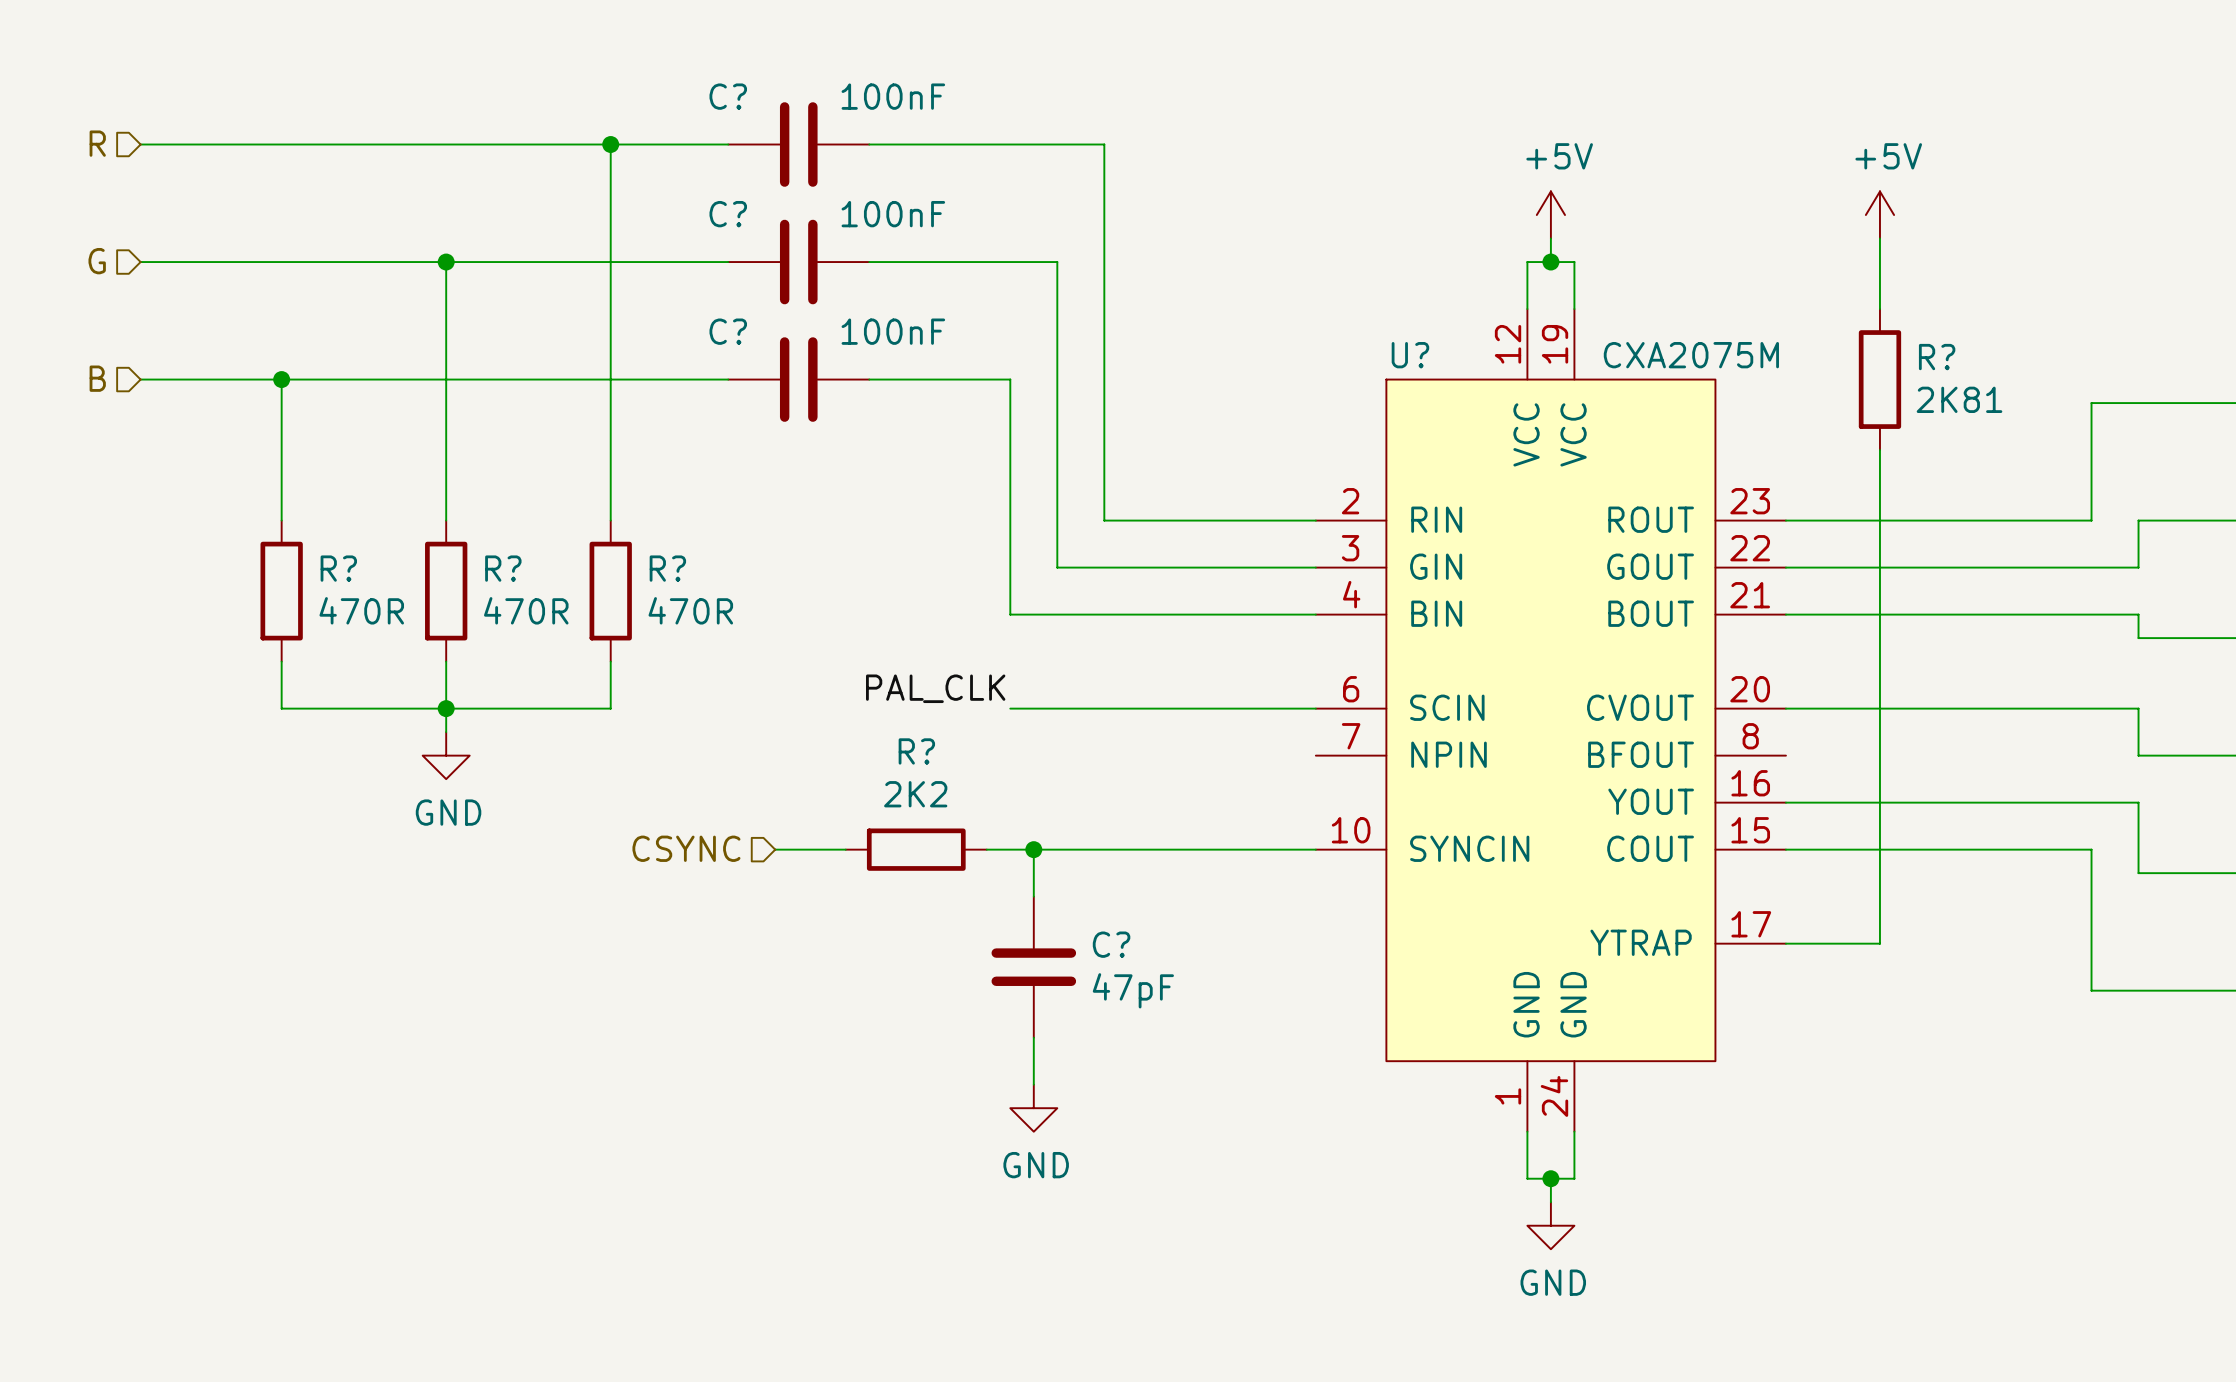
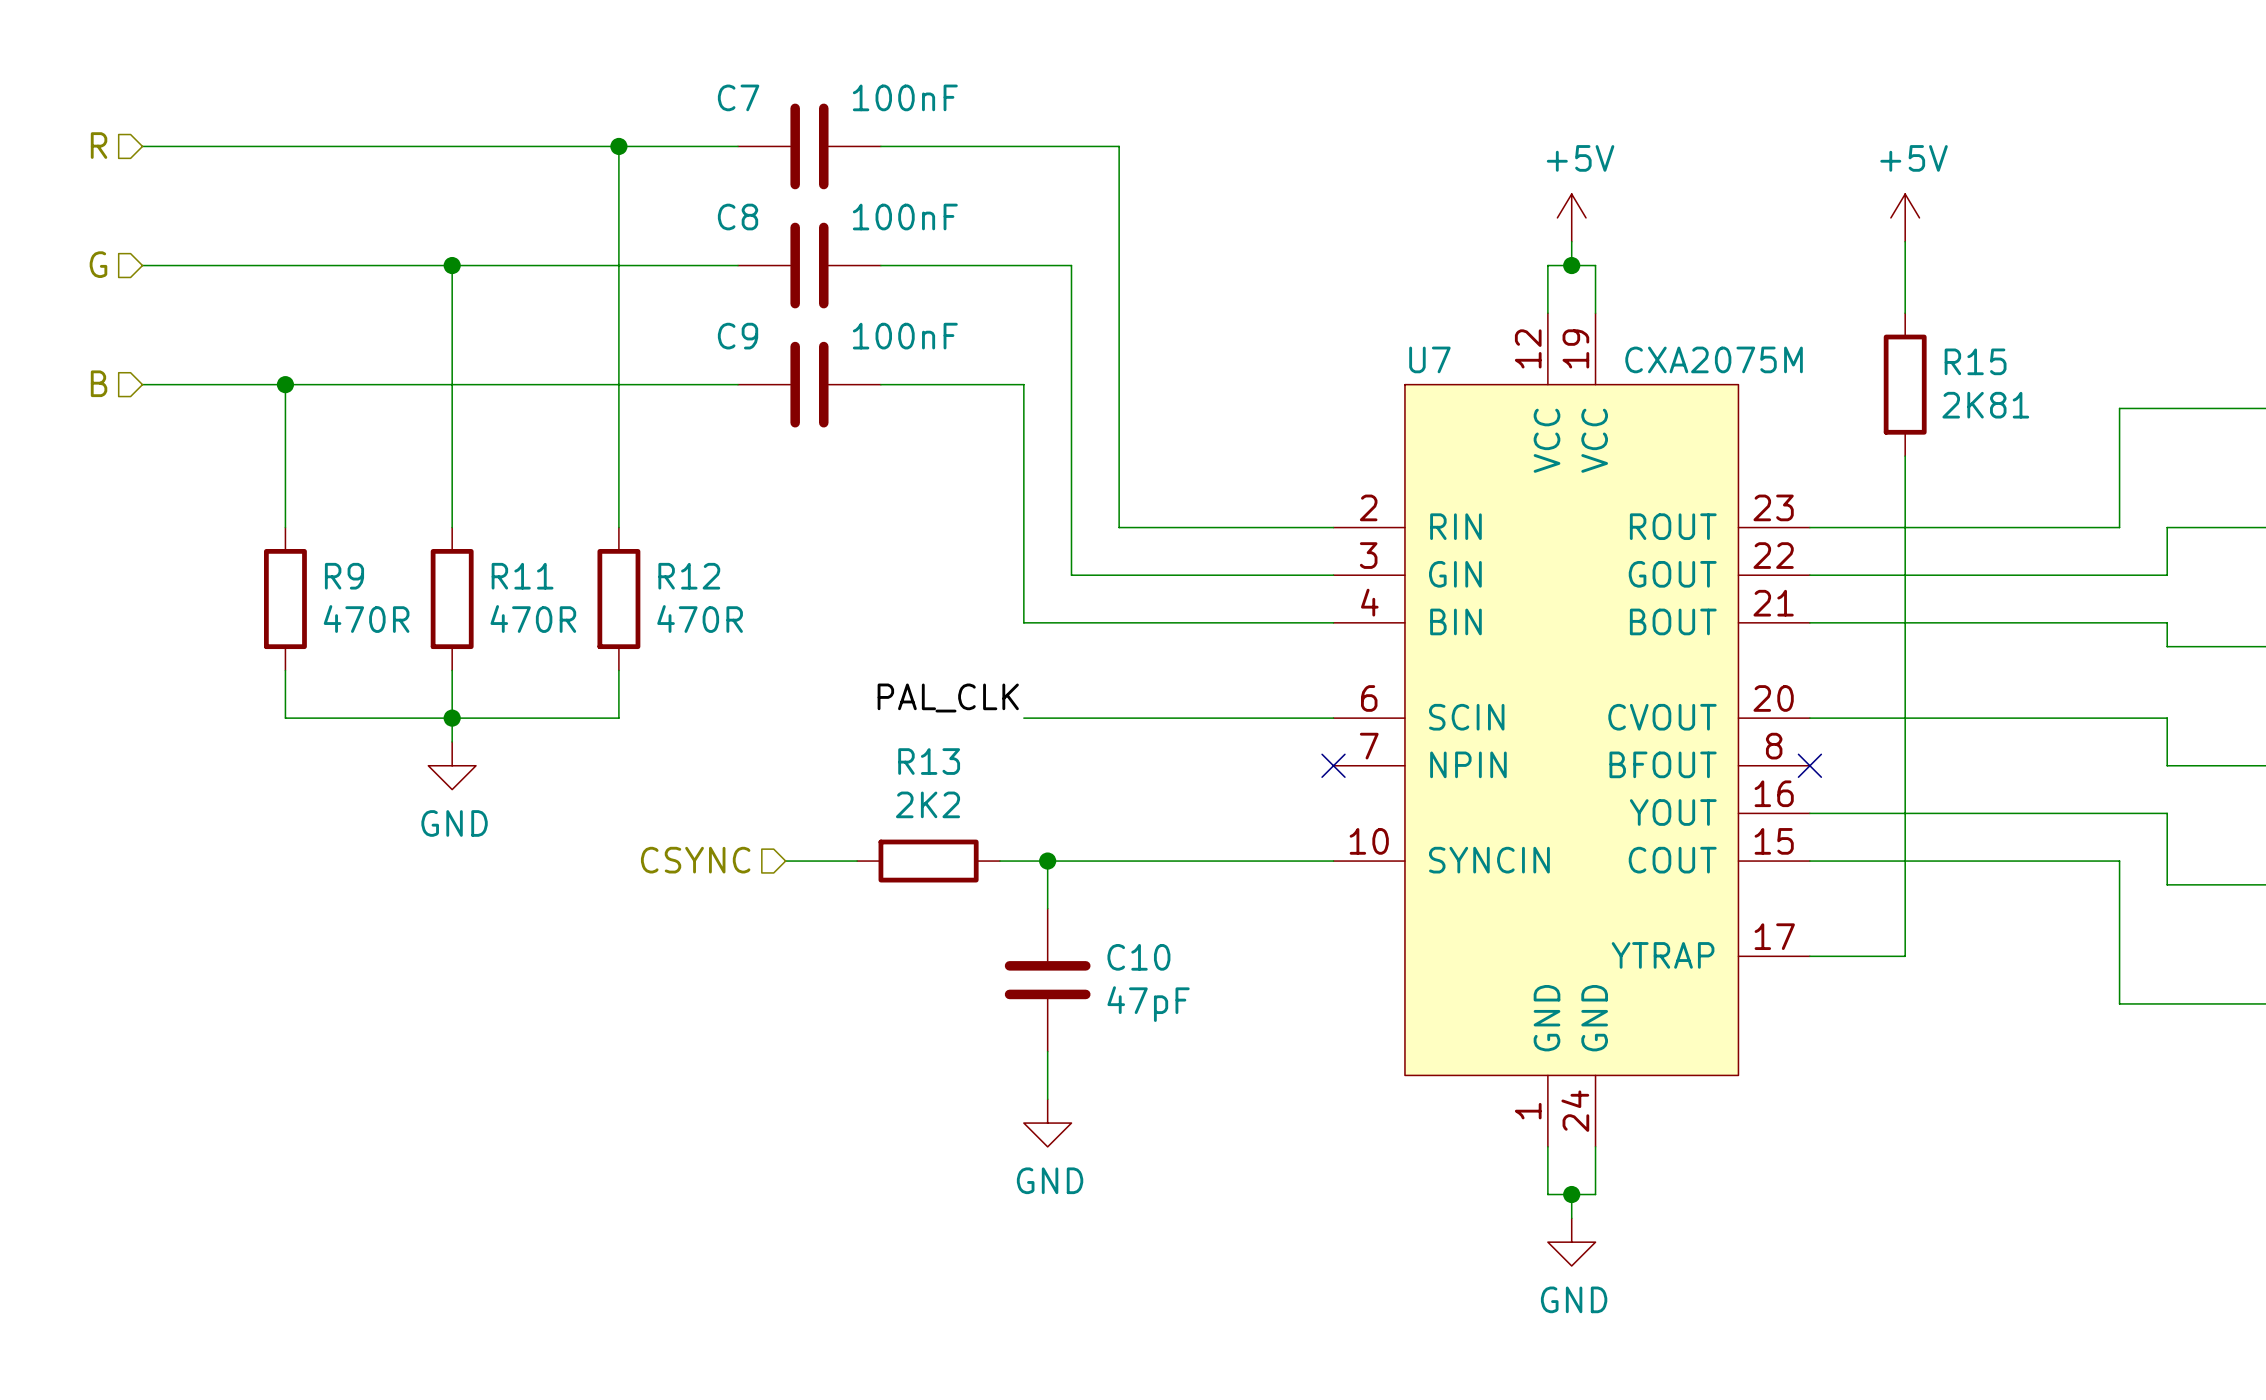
C? name: C? (728, 96) -> C7 (738, 97)
C? name: C? (728, 214) -> C8 (738, 217)
C? name: C? (728, 331) -> C9 (738, 336)
U? name: U? (1410, 355) -> U7 (1429, 359)
R? name: R? (1937, 357) -> R15 (1975, 361)
R? name: R? (338, 568) -> R9 (344, 576)
R? name: R? (503, 568) -> R11 (522, 576)
R? name: R? (667, 568) -> R12 (689, 576)
R? name: R? (916, 751) -> R13 (929, 761)
no-connect mark: none -> (1333, 765)
no-connect mark: none -> (1809, 765)
C? name: C? (1111, 944) -> C10 (1138, 957)

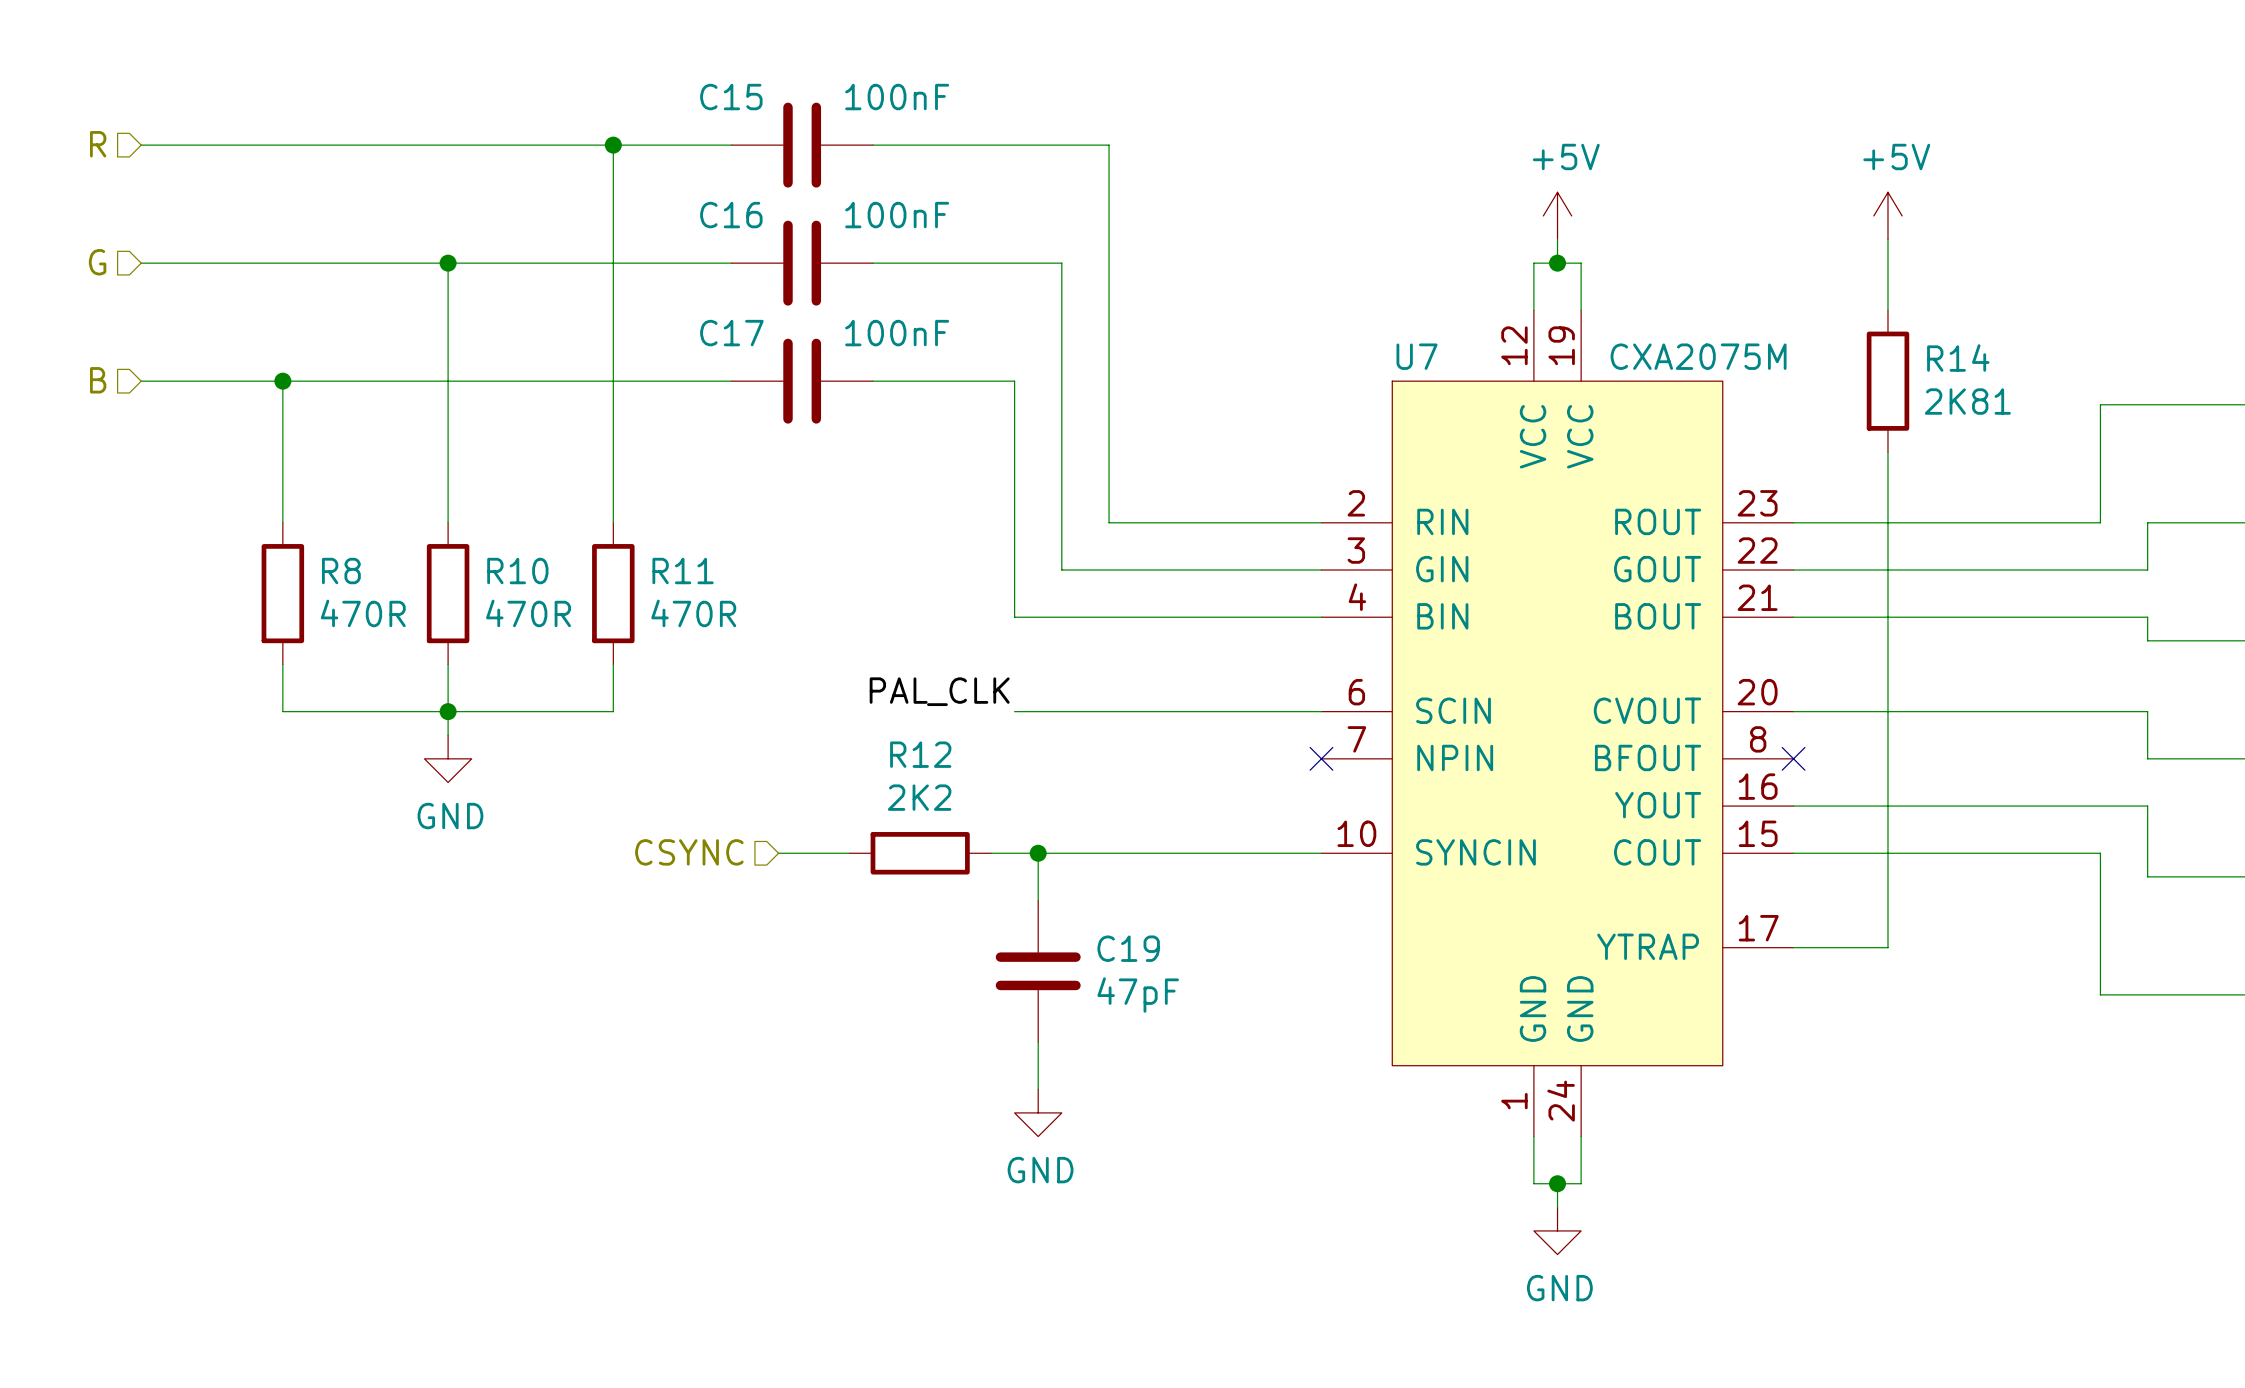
C7 name: C7 (738, 97) -> C15 (731, 97)
C8 name: C8 (738, 217) -> C16 (731, 215)
C9 name: C9 (738, 336) -> C17 (731, 333)
R15 name: R15 (1975, 361) -> R14 (1958, 358)
R9 name: R9 (344, 576) -> R8 (341, 571)
R11 name: R11 (522, 576) -> R10 (517, 571)
R12 name: R12 (689, 576) -> R11 (683, 571)
R13 name: R13 (929, 761) -> R12 (920, 754)
C10 name: C10 (1138, 957) -> C19 (1128, 948)

